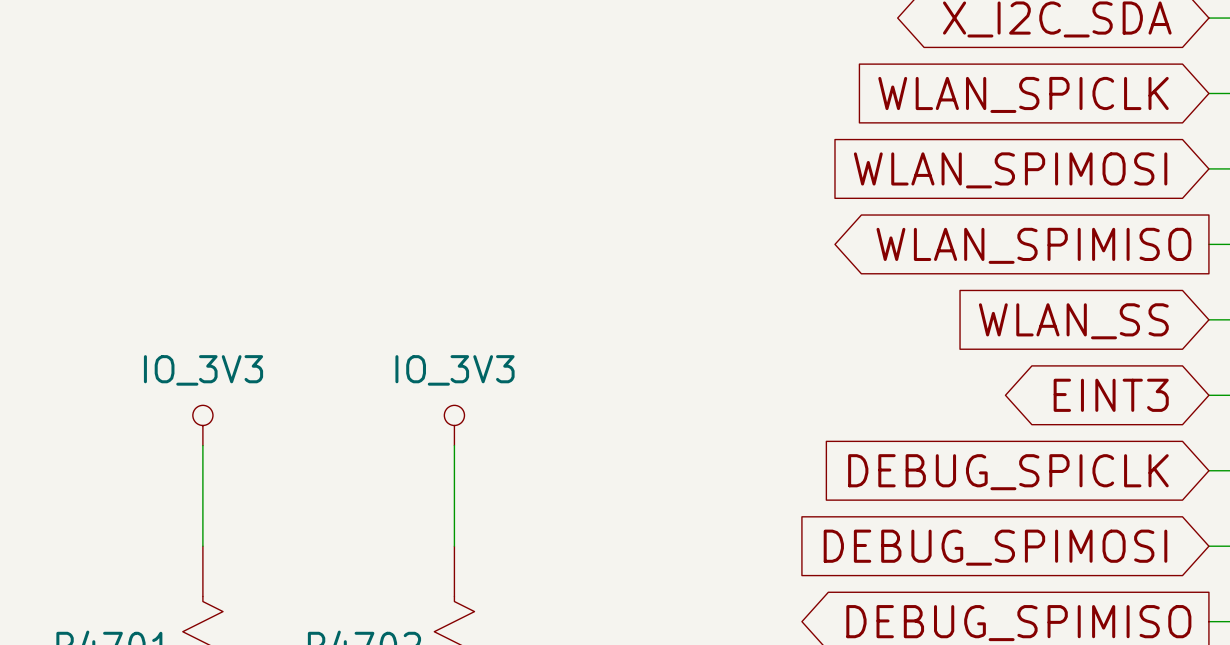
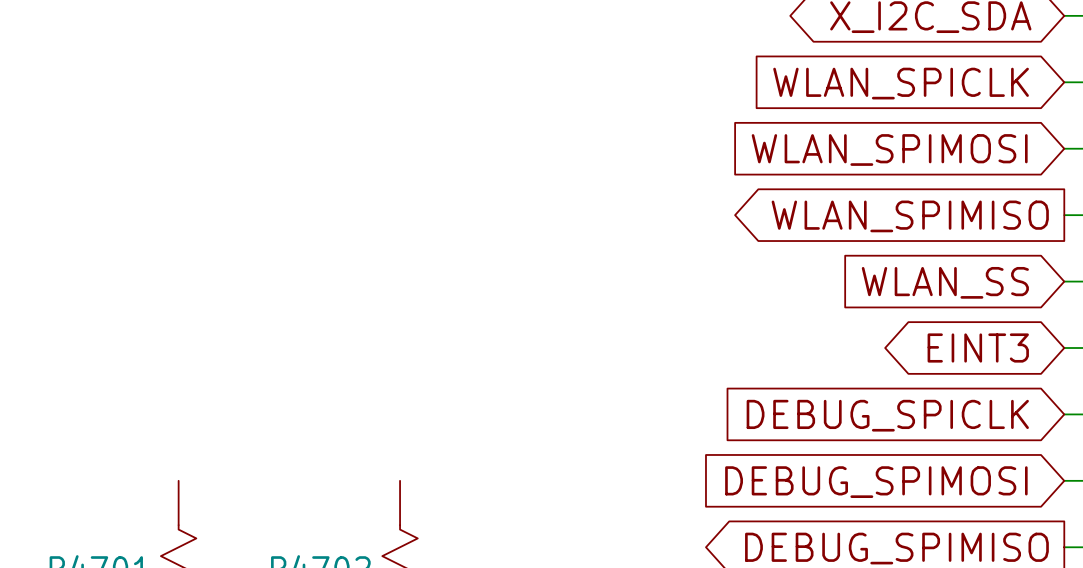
power symbol: IO_3V3 (202, 425) -> none
power symbol: IO_3V3 (454, 425) -> none
wire: (202, 445) (202, 546) -> none
wire: (454, 445) (454, 546) -> none

